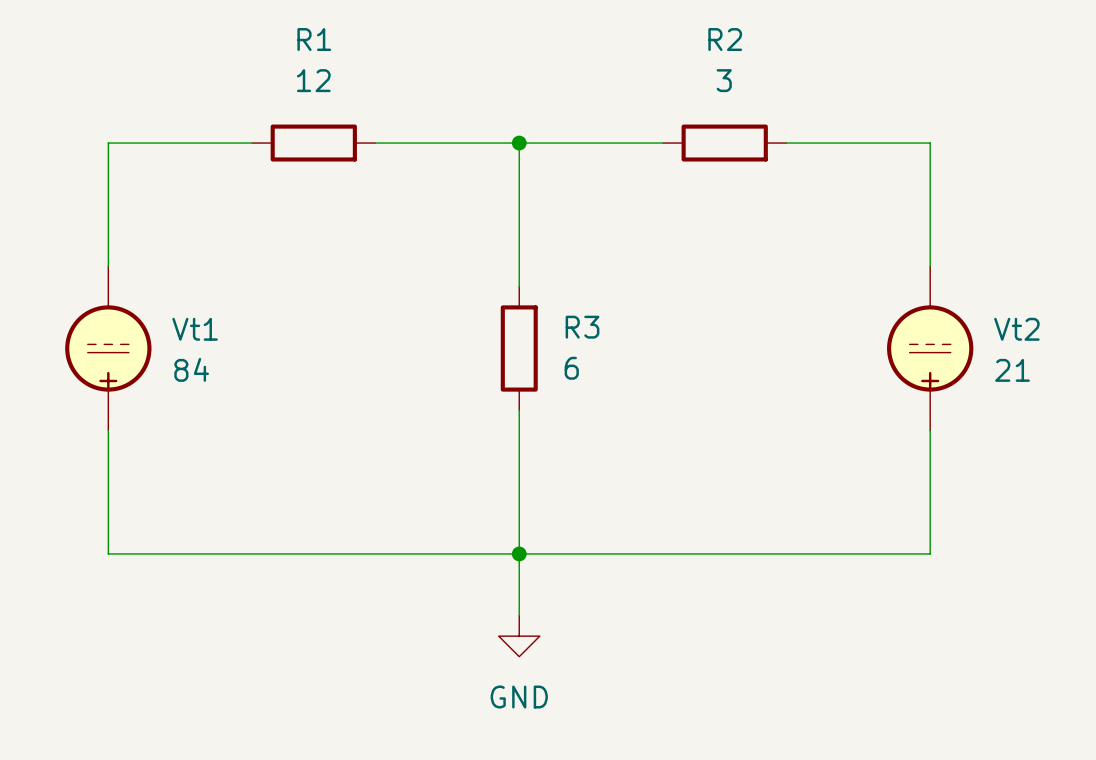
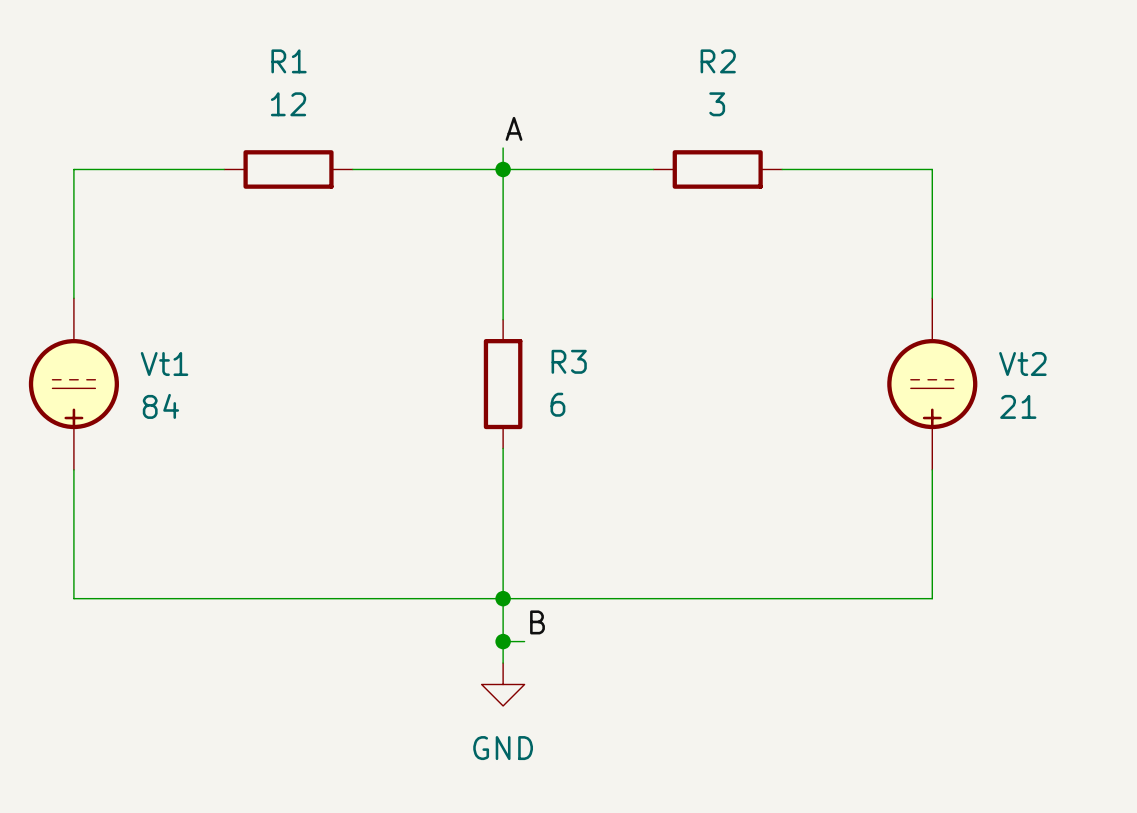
label: none -> A (514, 128)
wire: none -> (503, 148) (503, 169)
label: none -> B (537, 622)
wire: none -> (503, 641) (524, 641)
junction: none -> (503, 641)

